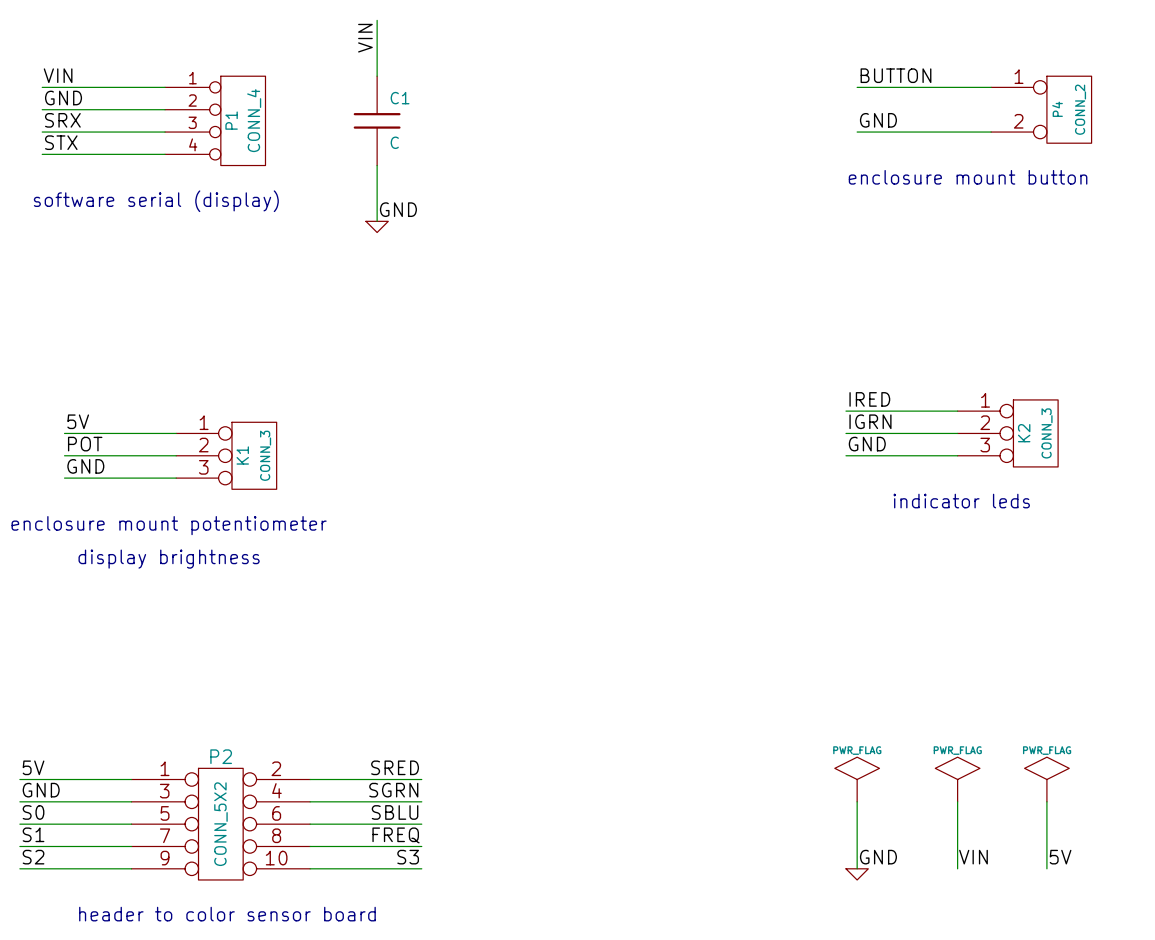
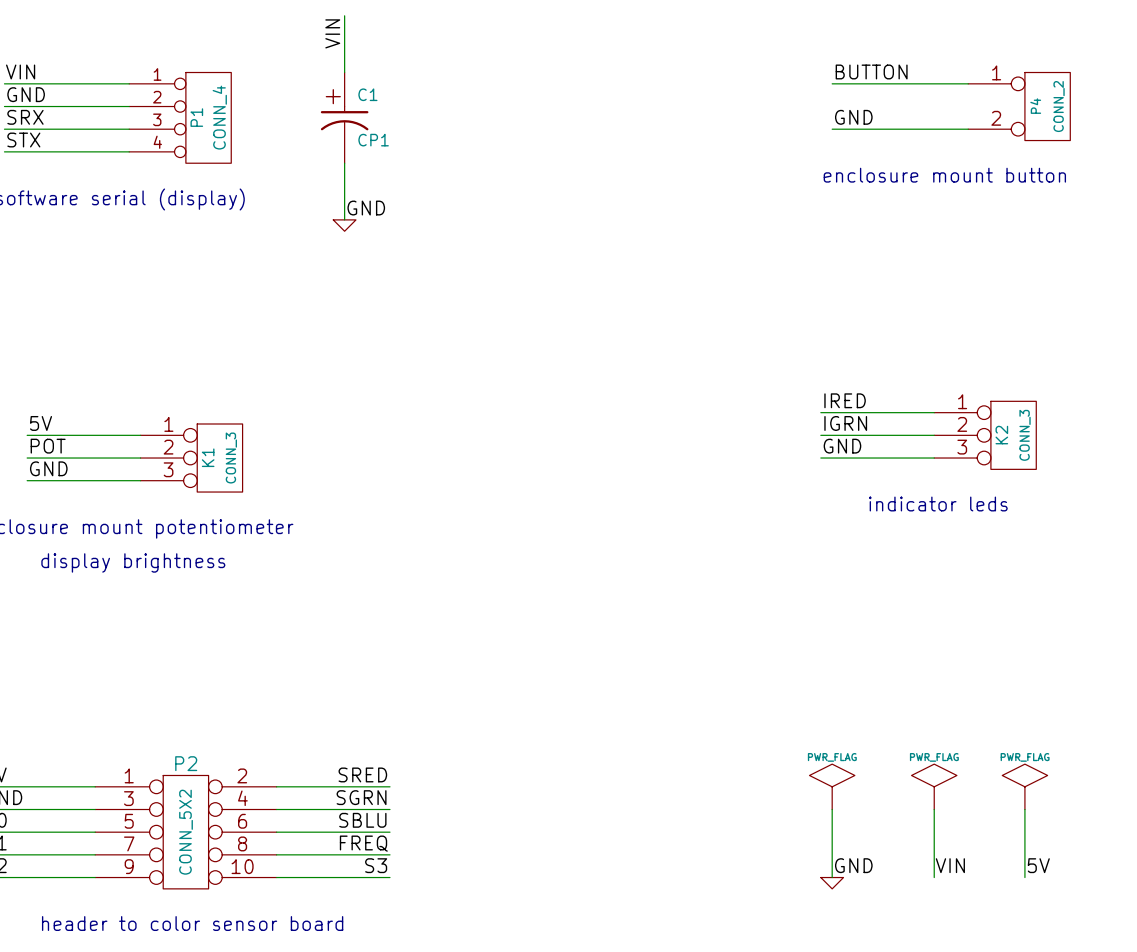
C1 symbol: [353, 76, 401, 166] -> [320, 72, 369, 164]
C1 value: C (394, 142) -> CP1 (373, 140)

